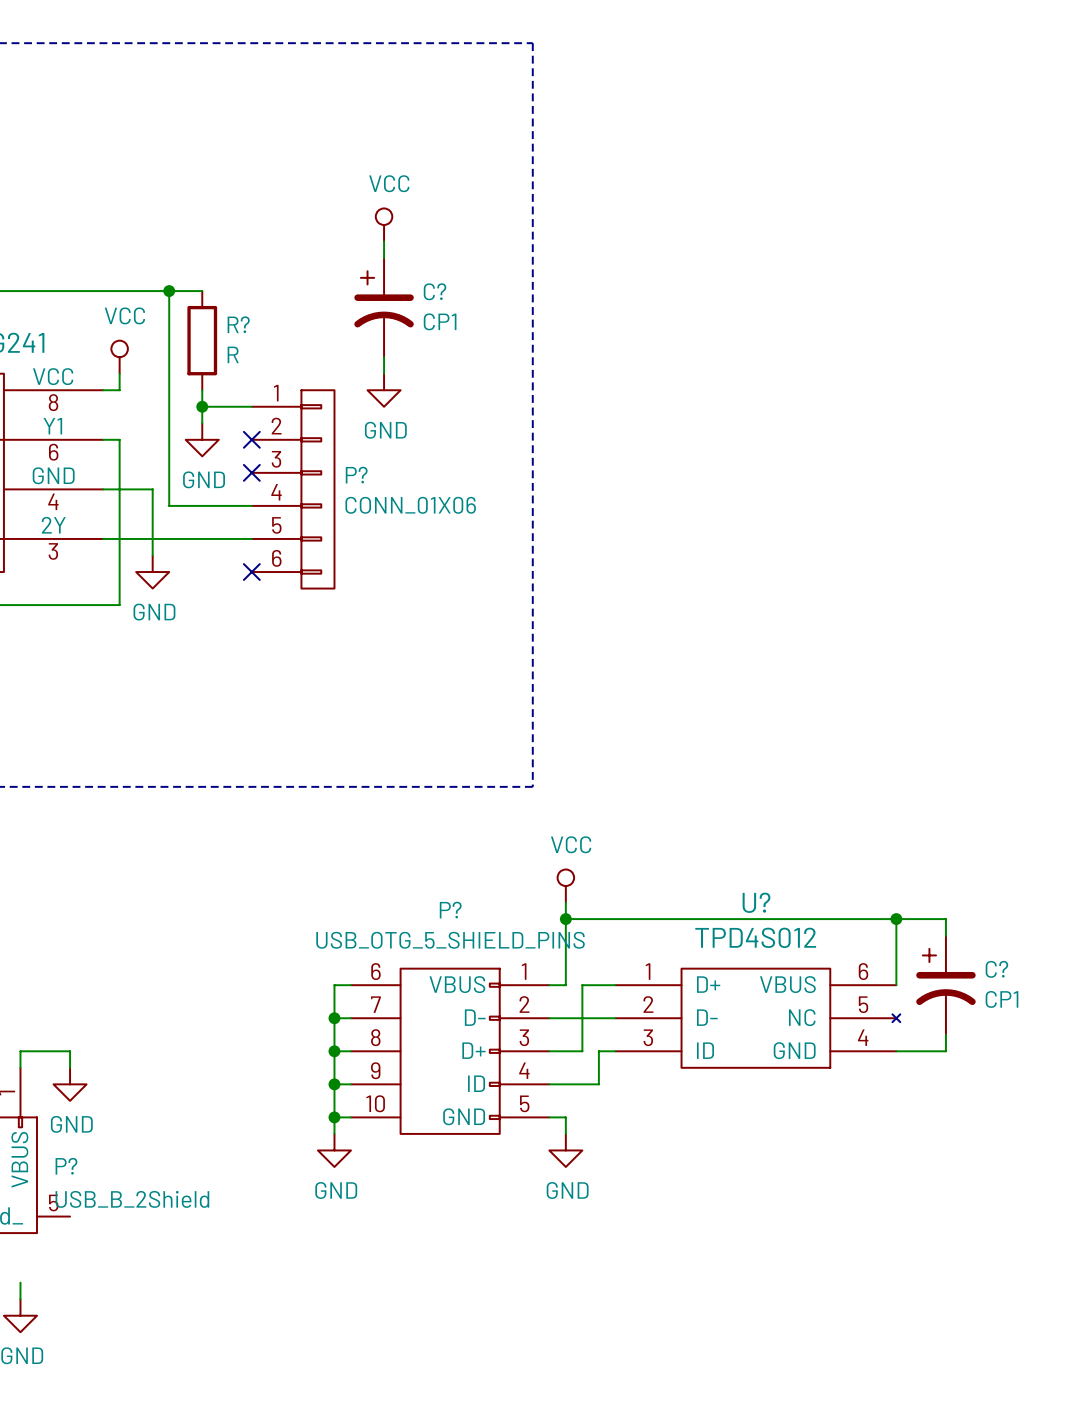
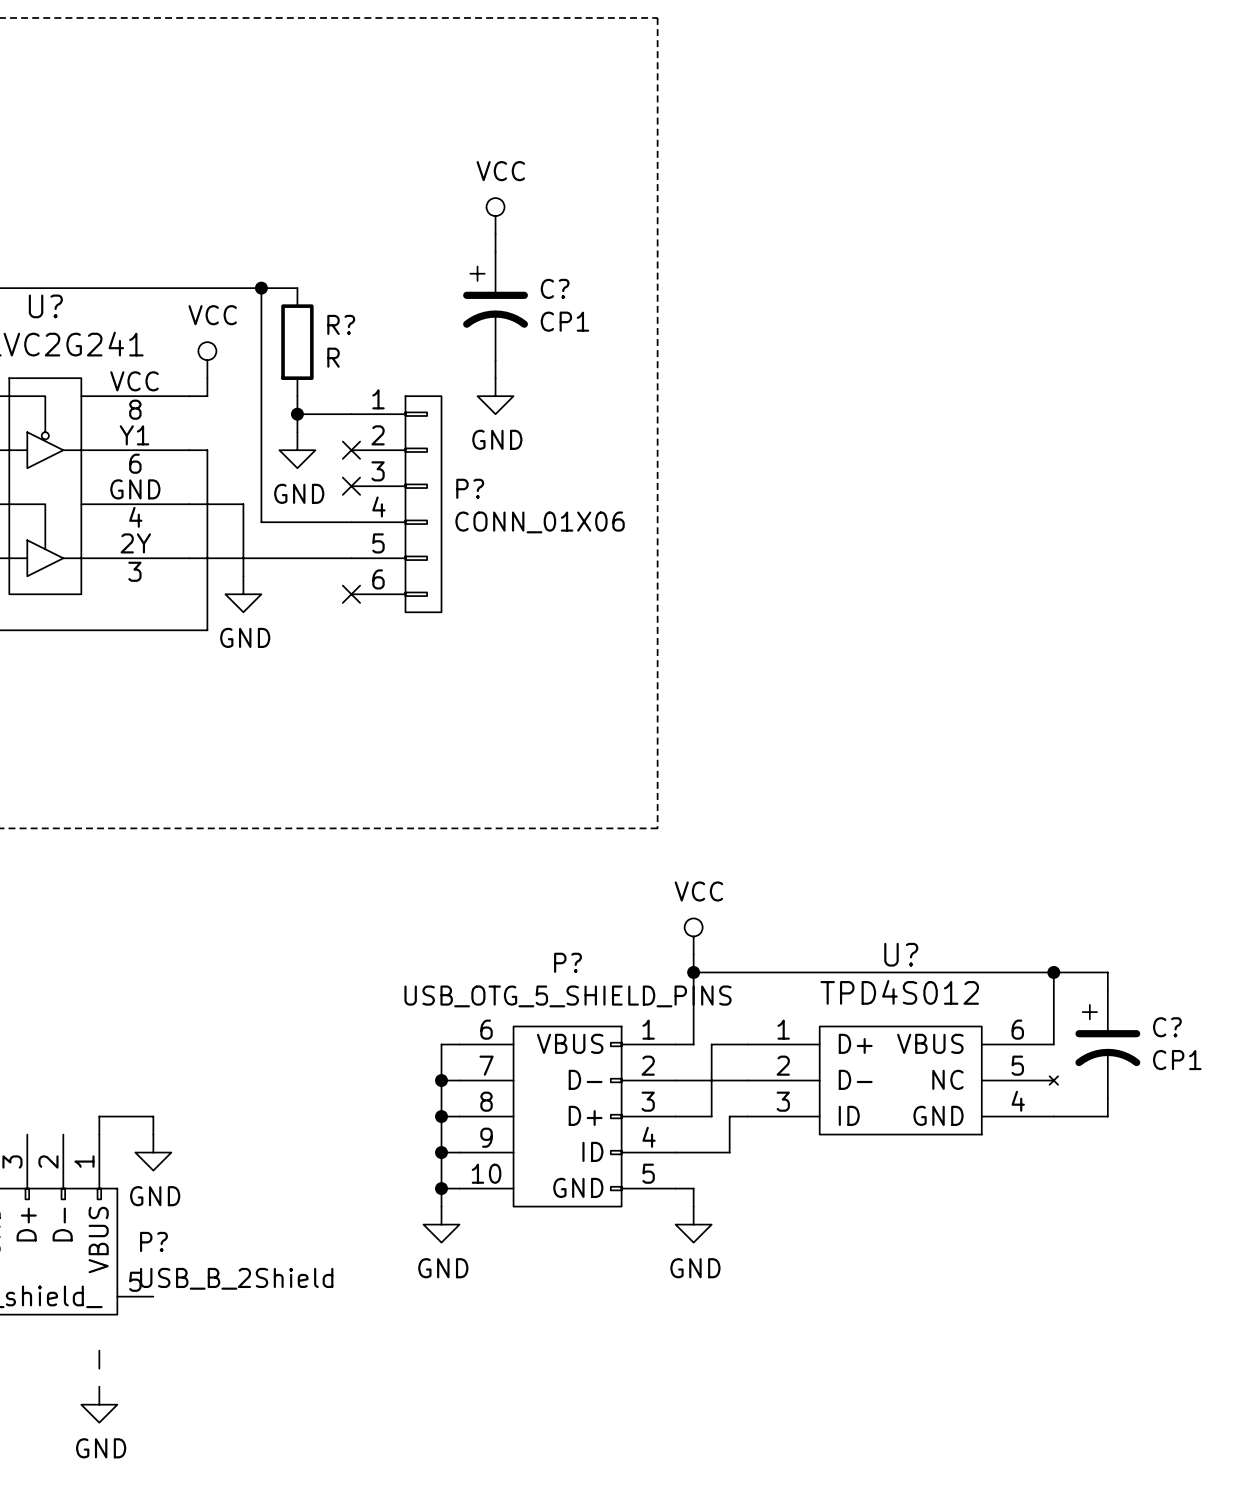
wire: (20, 1282) (20, 1299) -> (99, 1368) (99, 1350)

